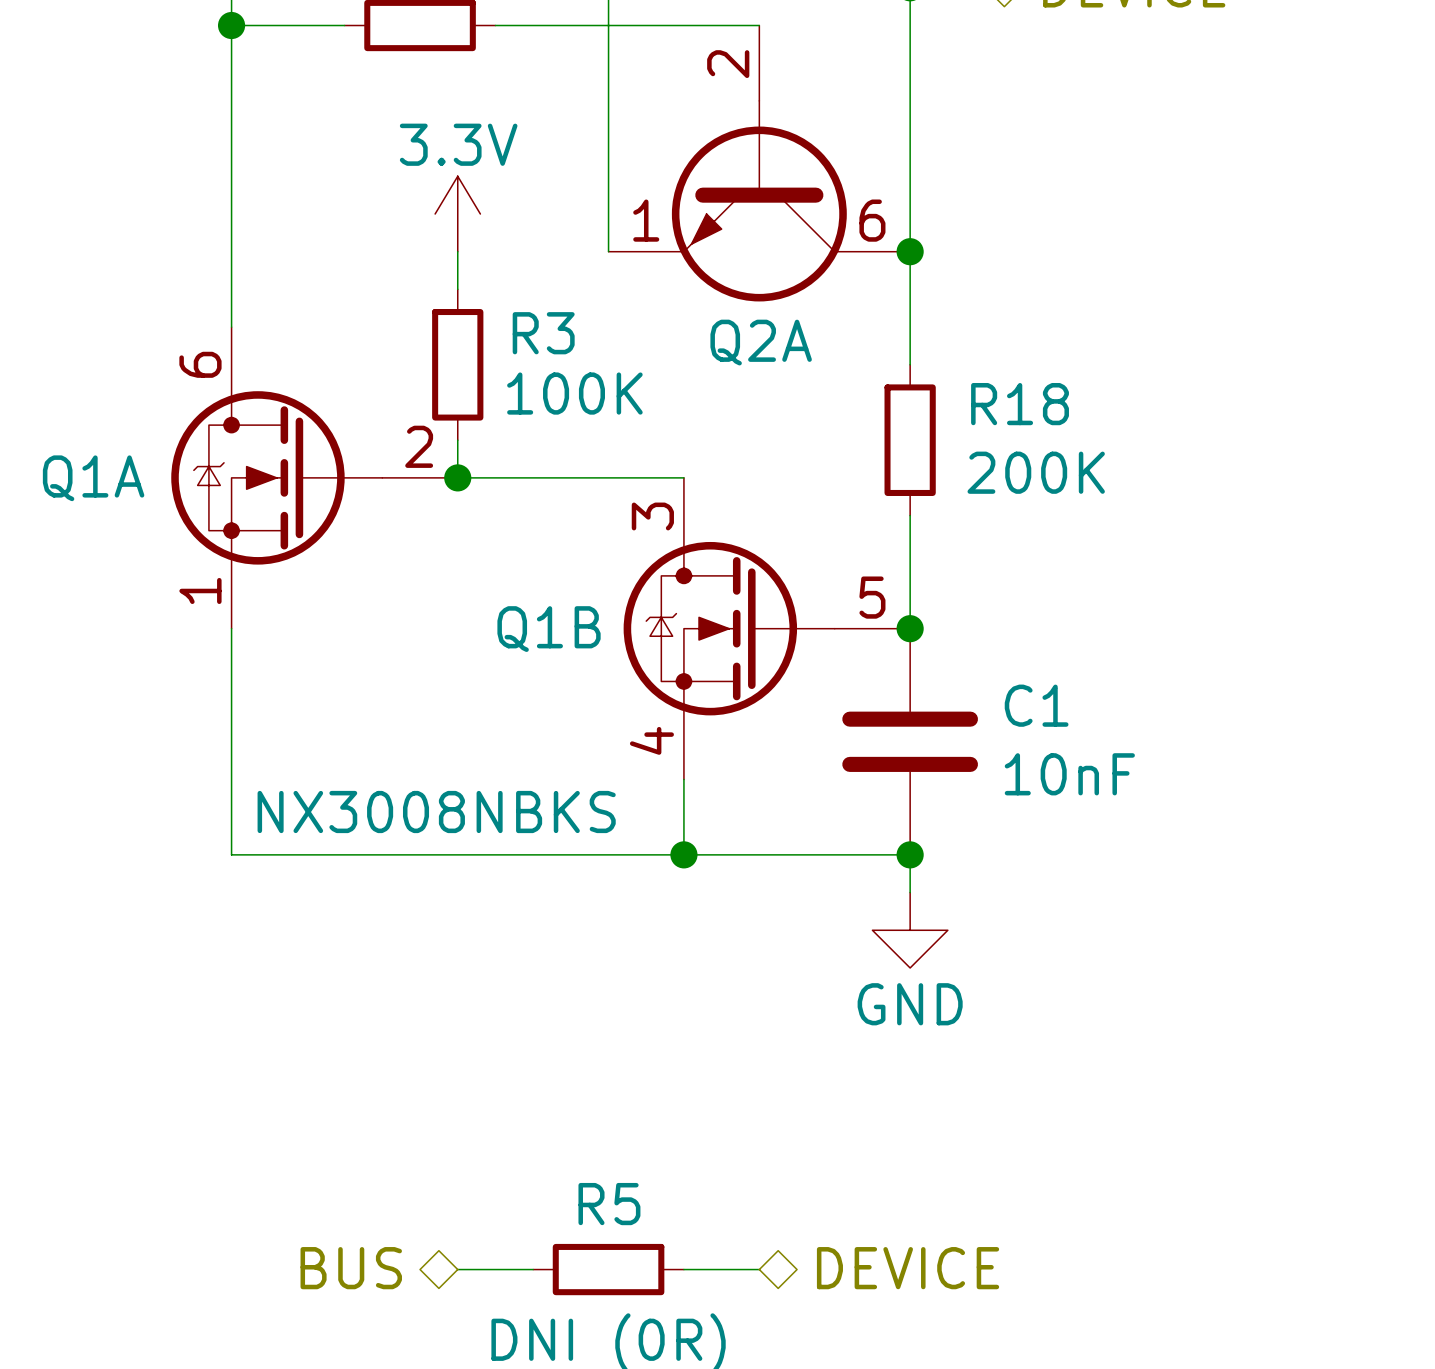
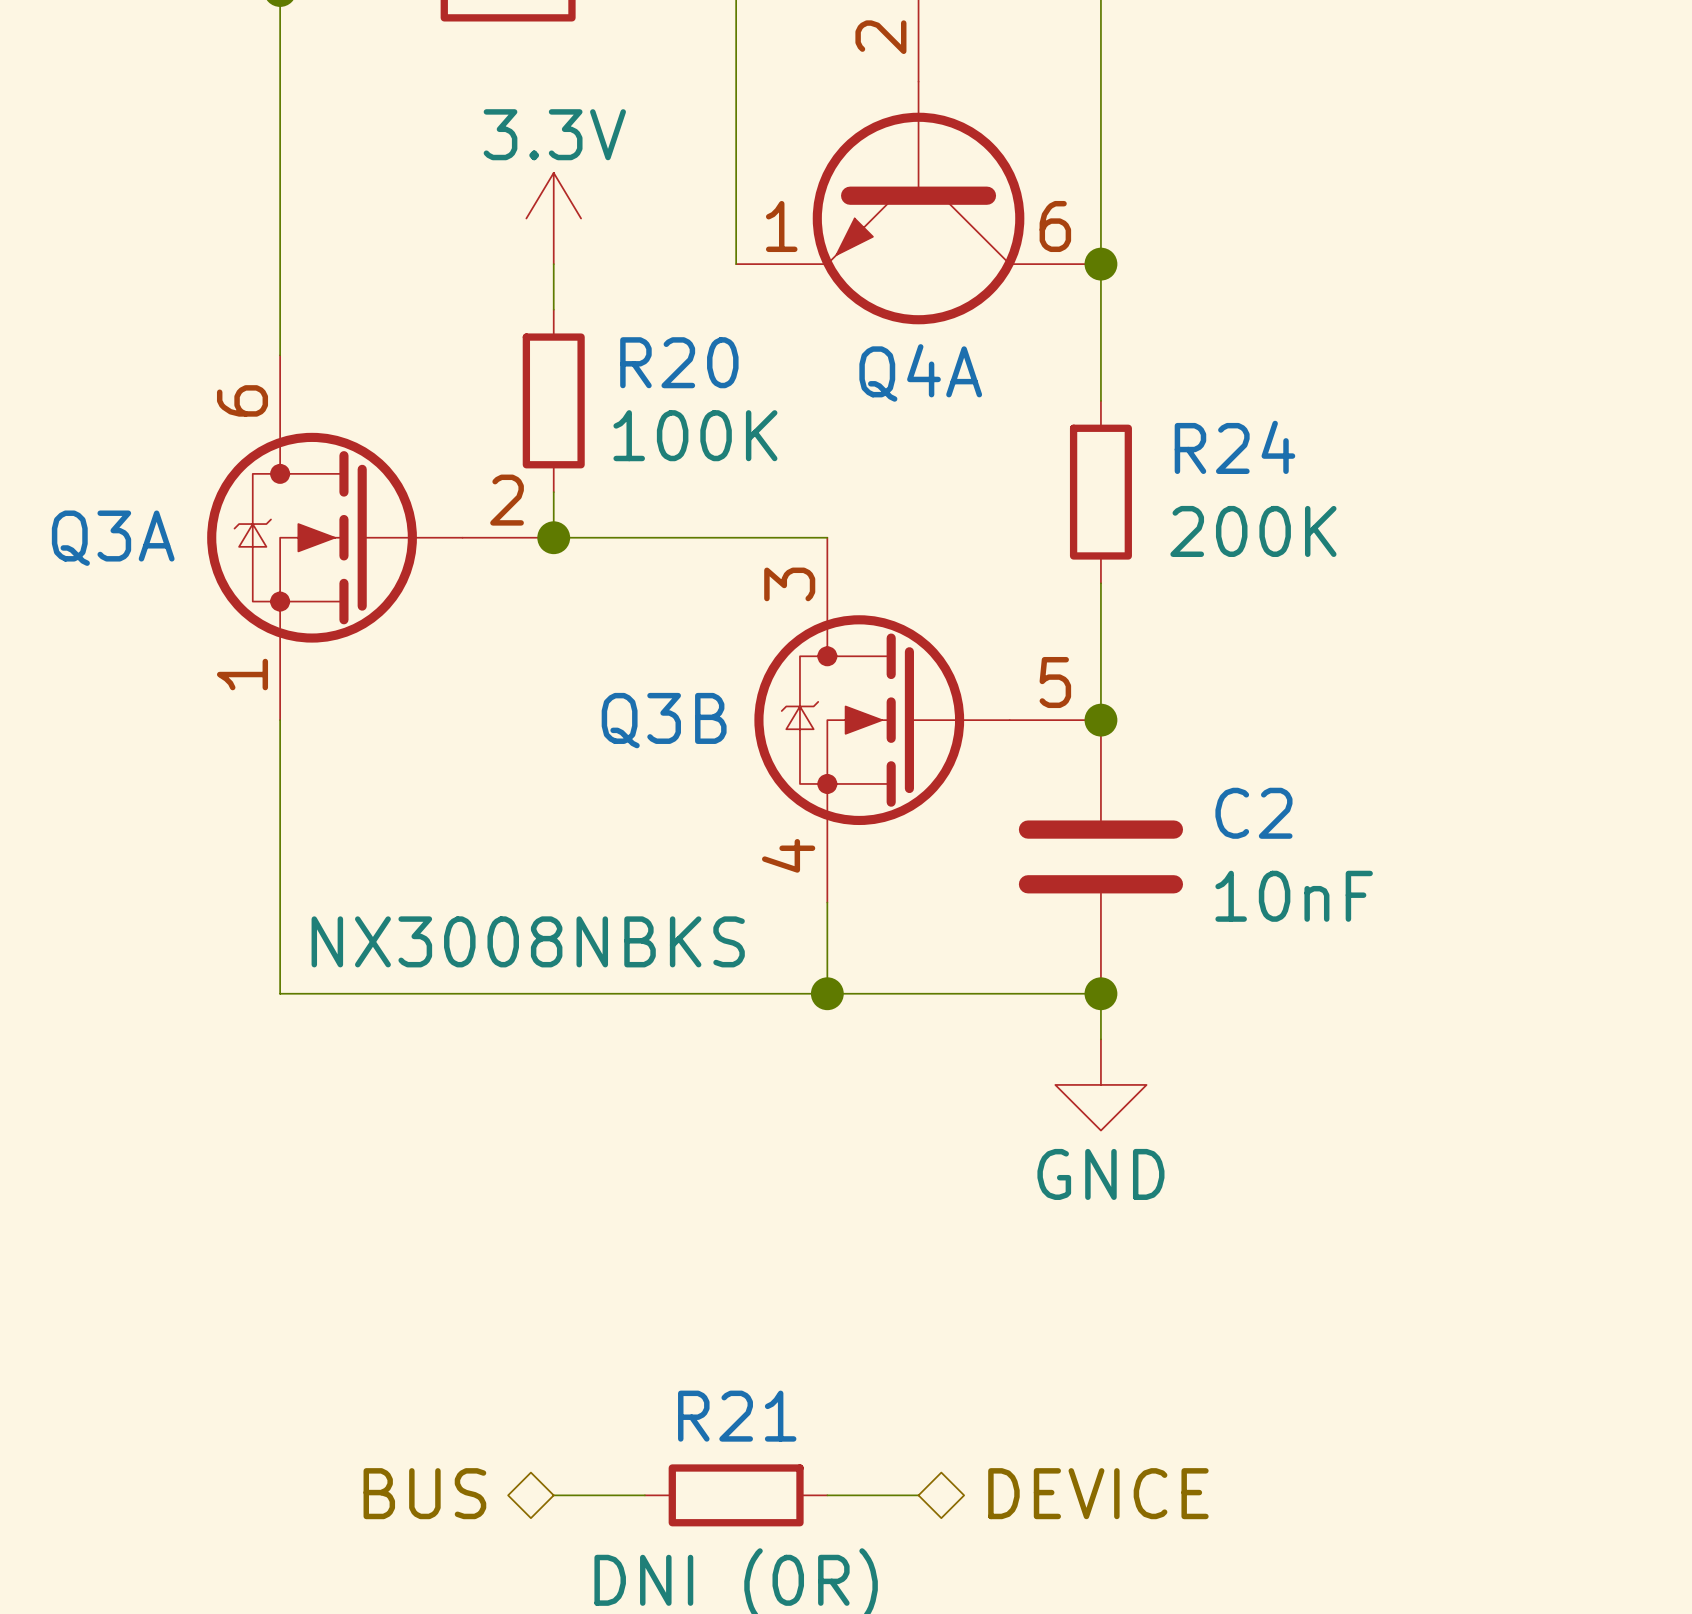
R3 name: R3 (543, 333) -> R20 (679, 362)
Q2A name: Q2A (761, 342) -> Q4A (920, 372)
R18 name: R18 (1020, 404) -> R24 (1234, 447)
Q1A name: Q1A (93, 478) -> Q3A (113, 538)
Q1B name: Q1B (549, 629) -> Q3B (664, 720)
C1 name: C1 (1036, 705) -> C2 (1253, 813)
R5 name: R5 (609, 1204) -> R21 (737, 1416)

